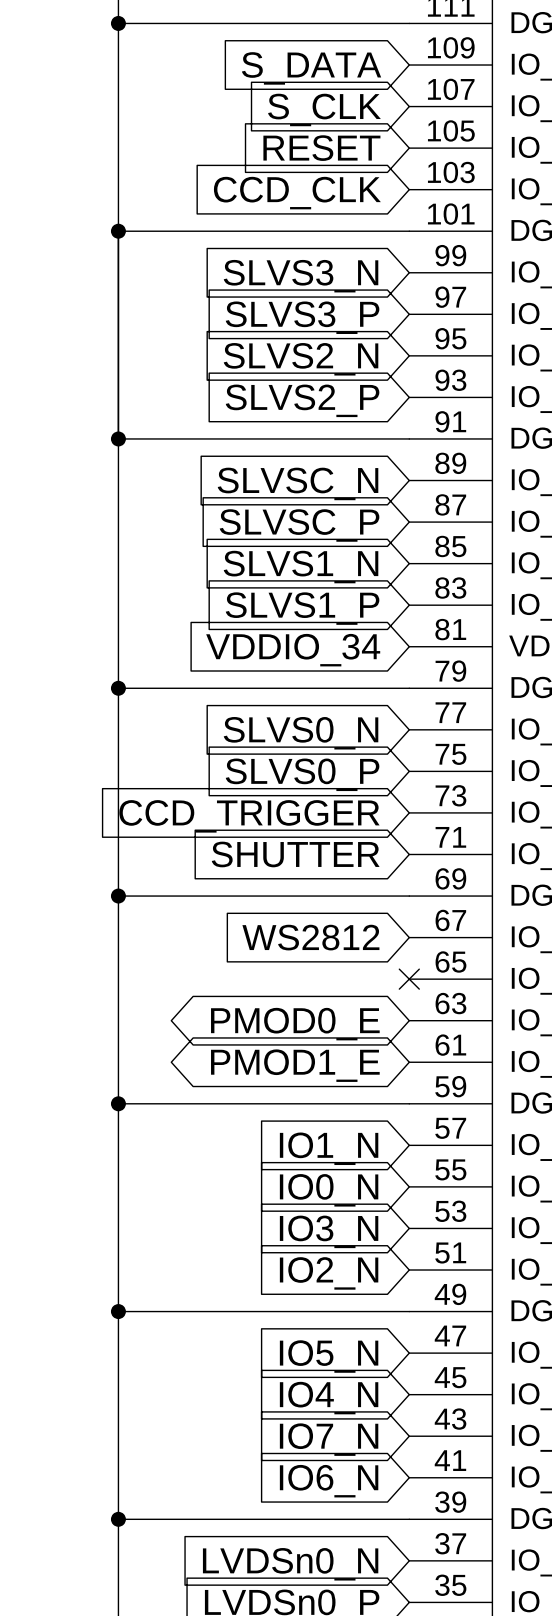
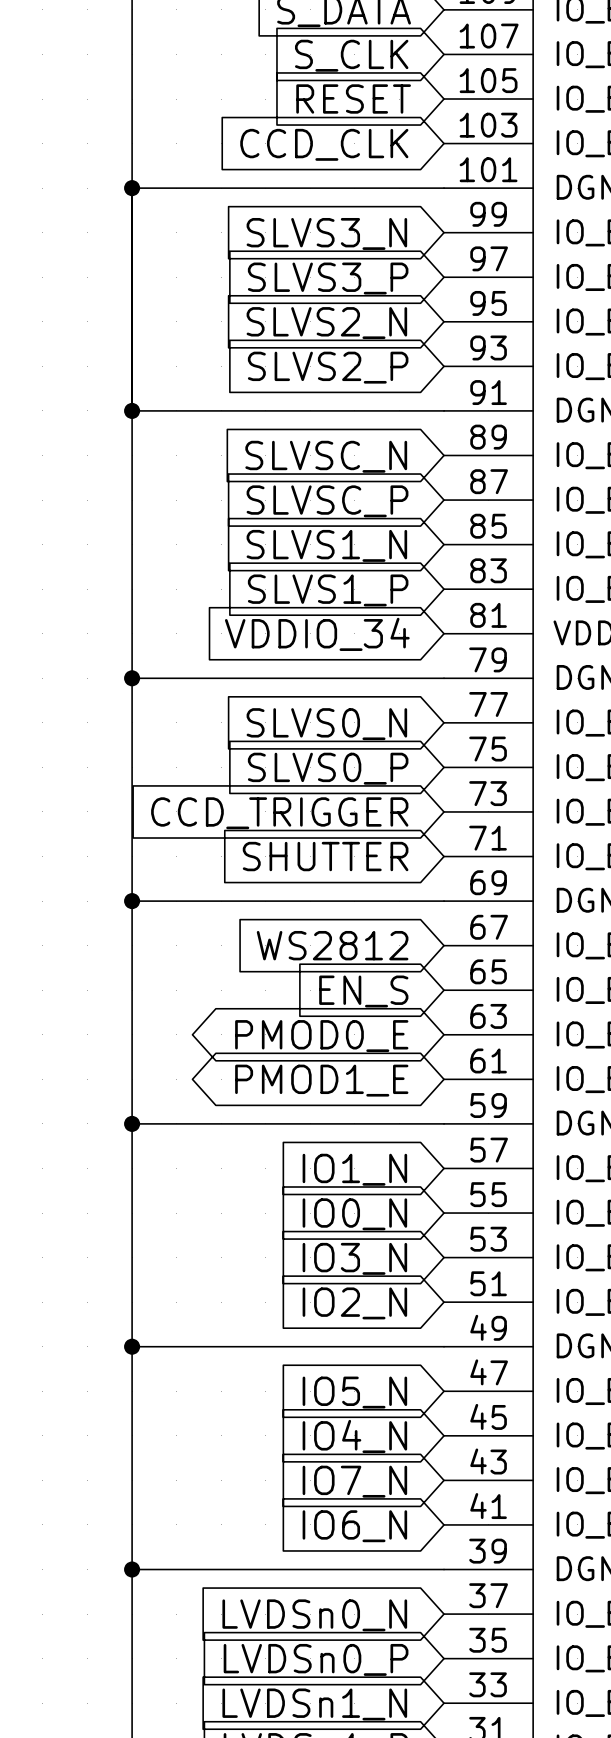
no-connect mark: (409, 979) -> none
global label: none -> EN_S (363, 991)

